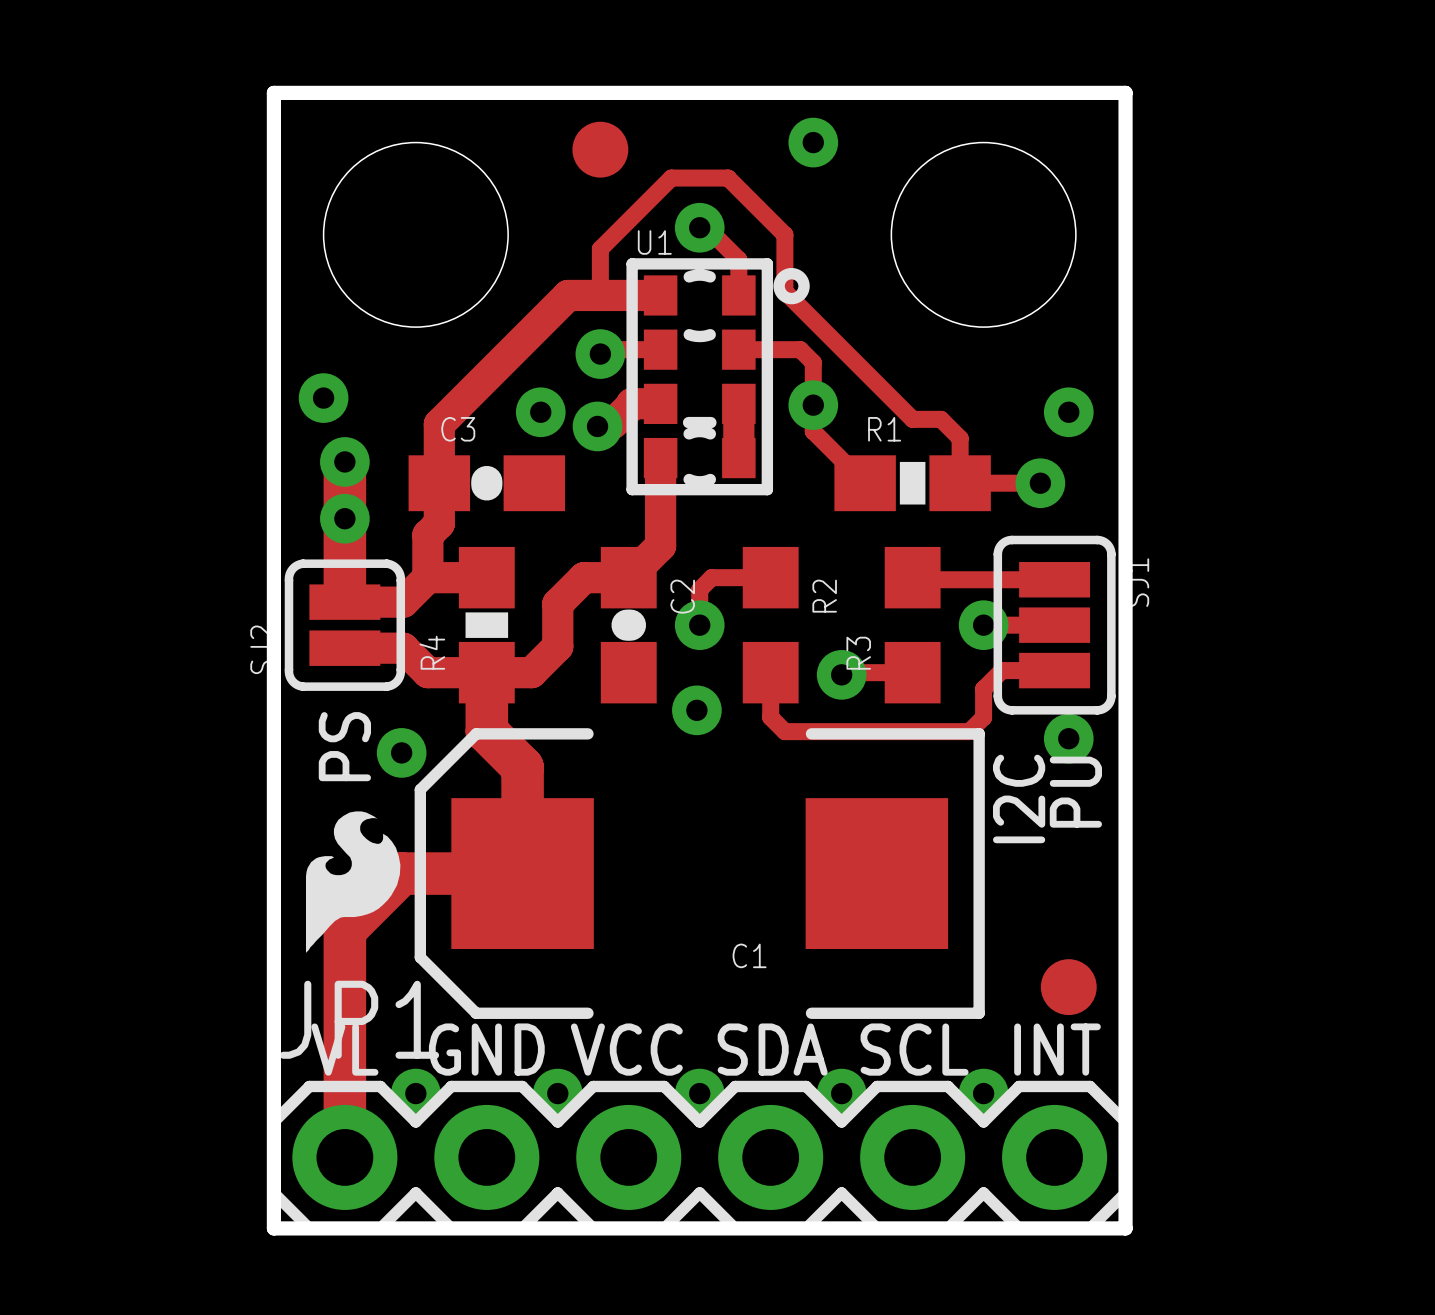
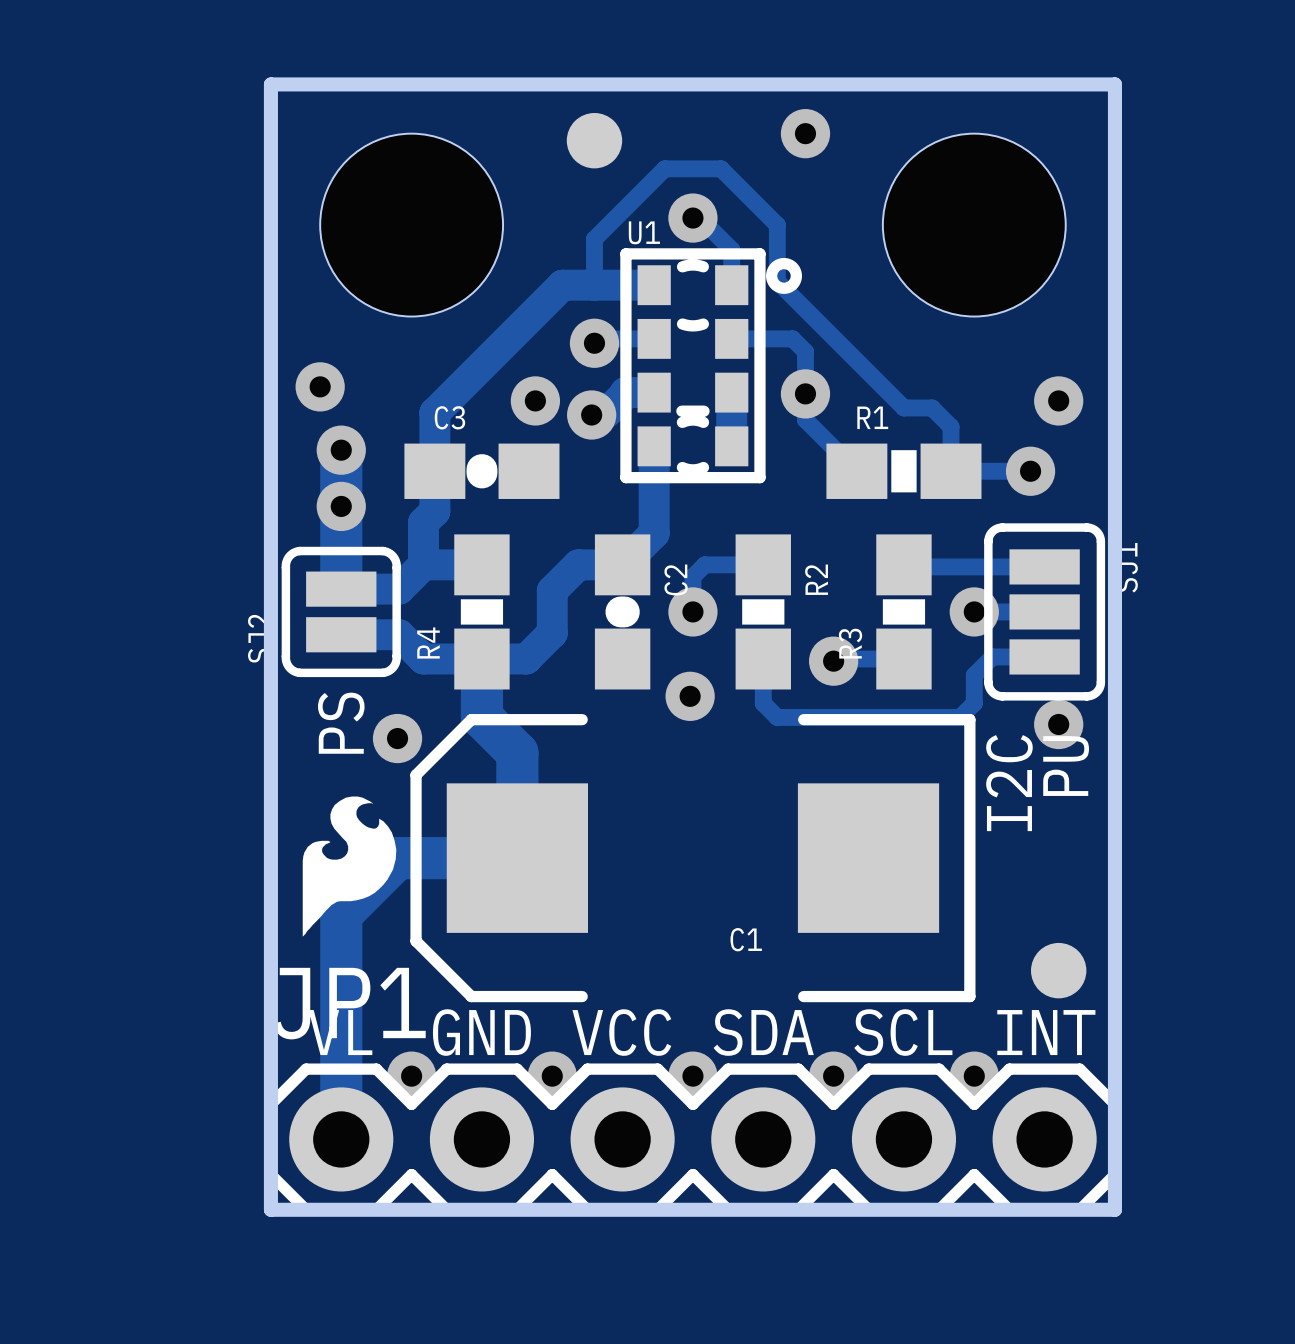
R2 footprint: [742, 546, 799, 704] -> [735, 534, 791, 690]
R3 footprint: [884, 546, 941, 704] -> [876, 534, 932, 690]

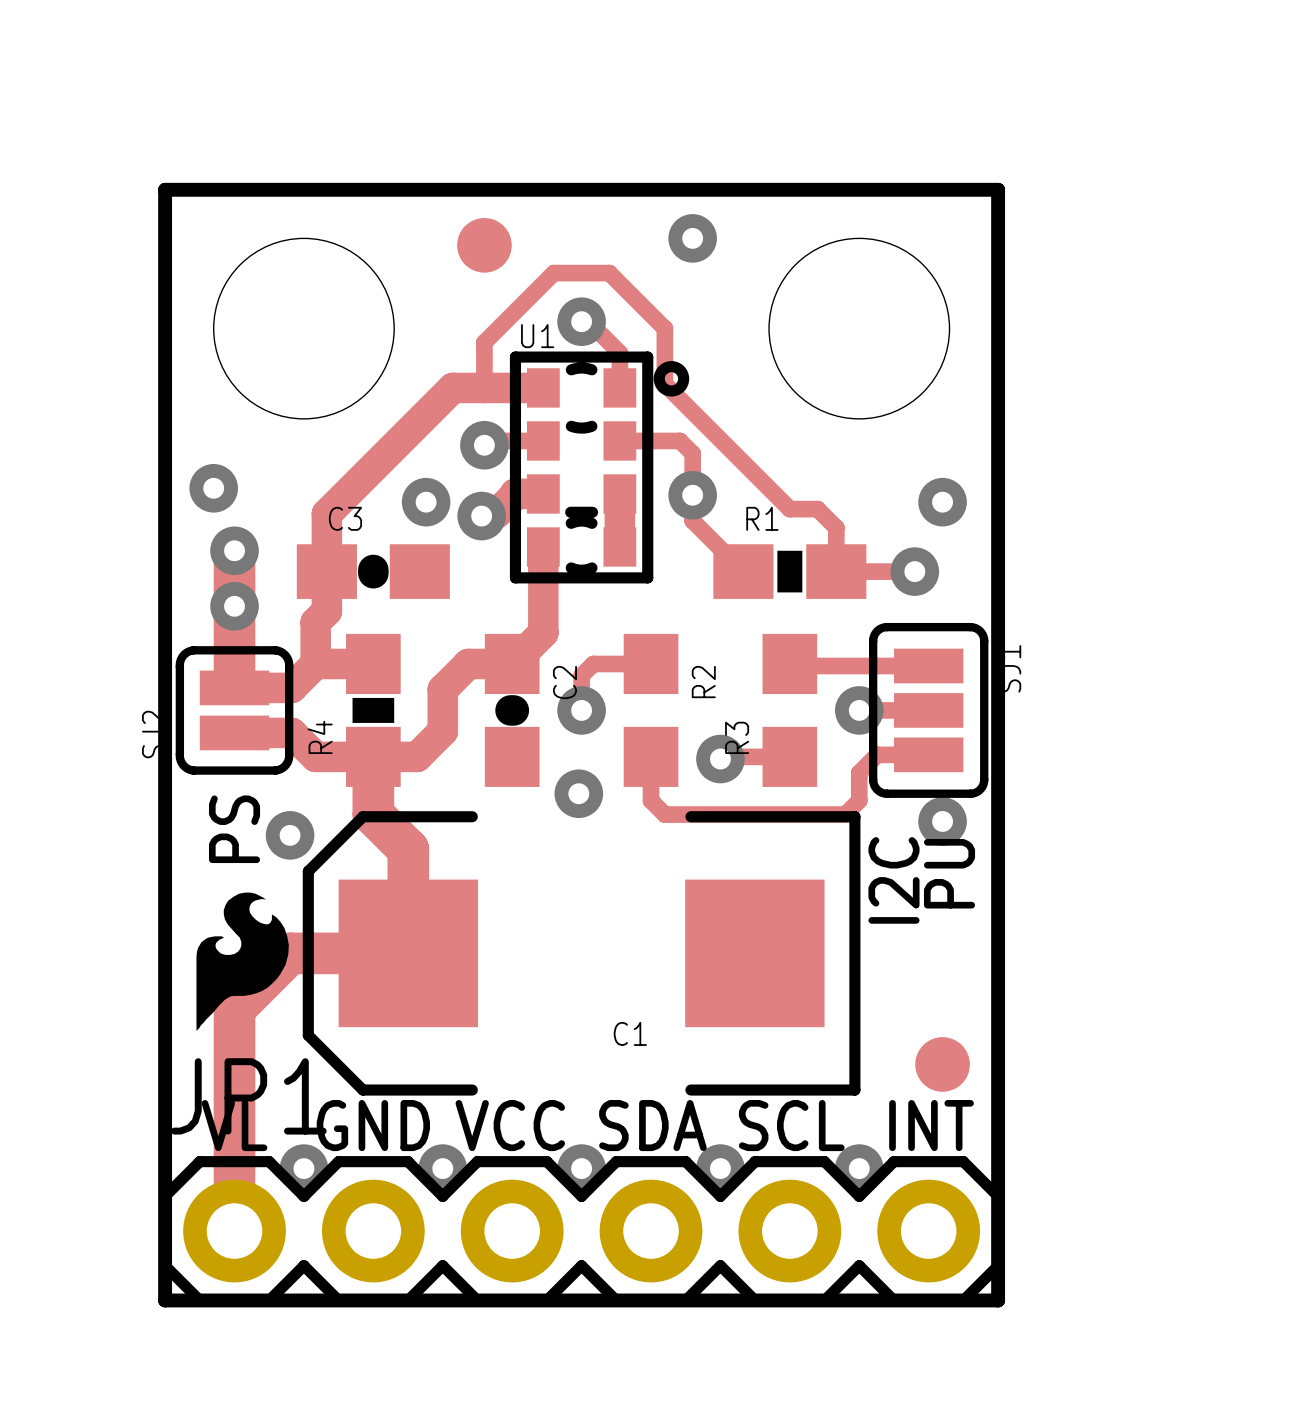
R2 footprint: [735, 534, 791, 690] -> [623, 633, 679, 787]
R3 footprint: [876, 534, 932, 690] -> [762, 633, 818, 787]

